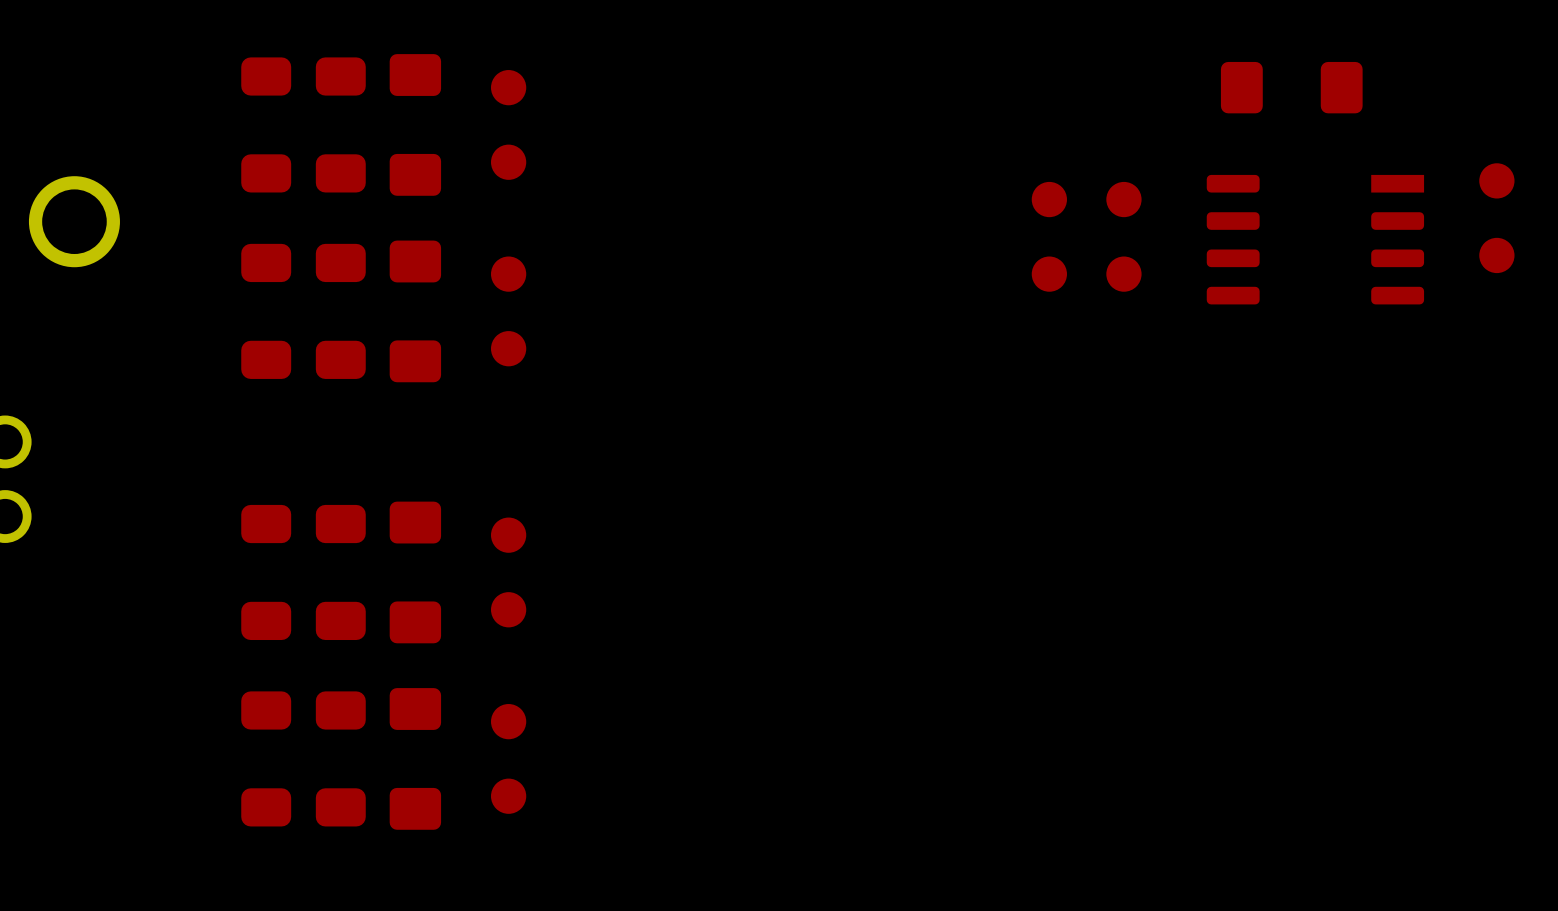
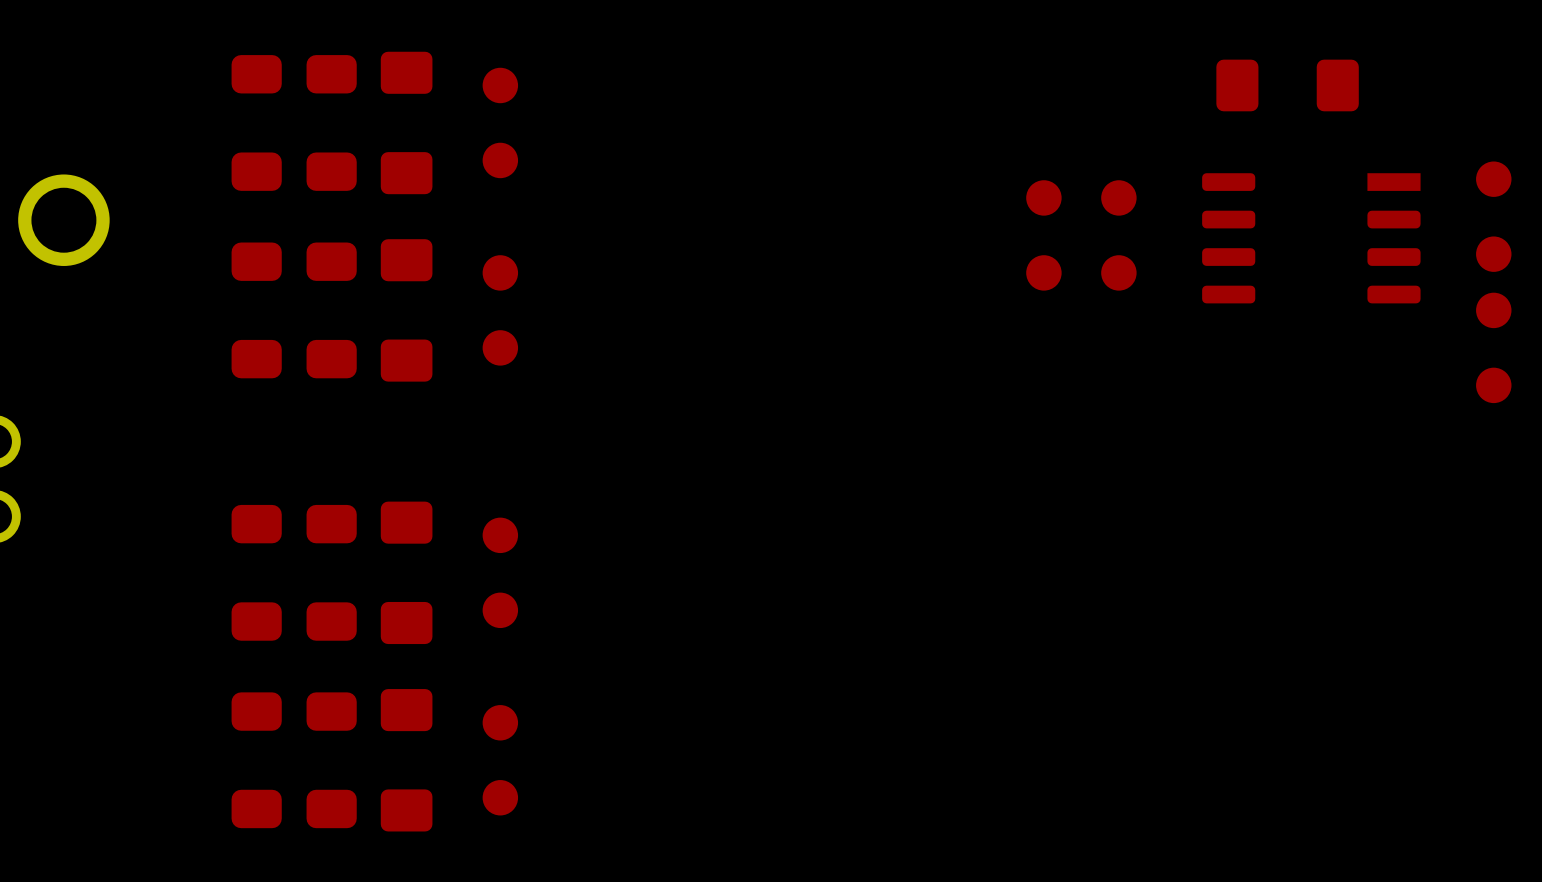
part: none -> (1493, 347)

